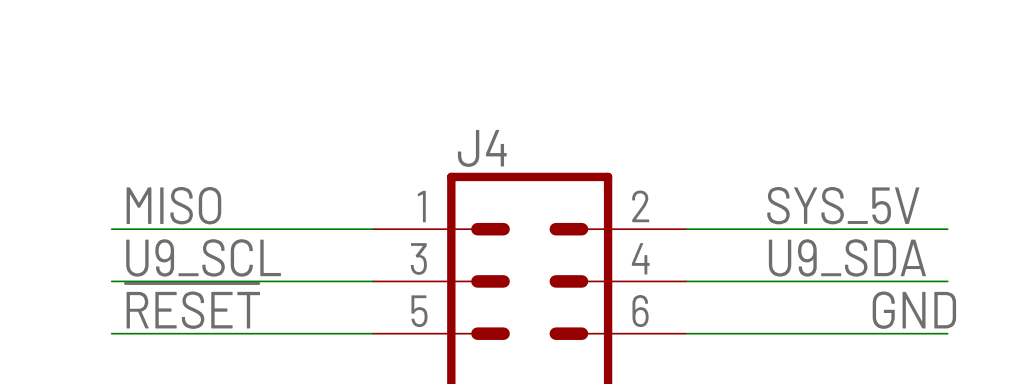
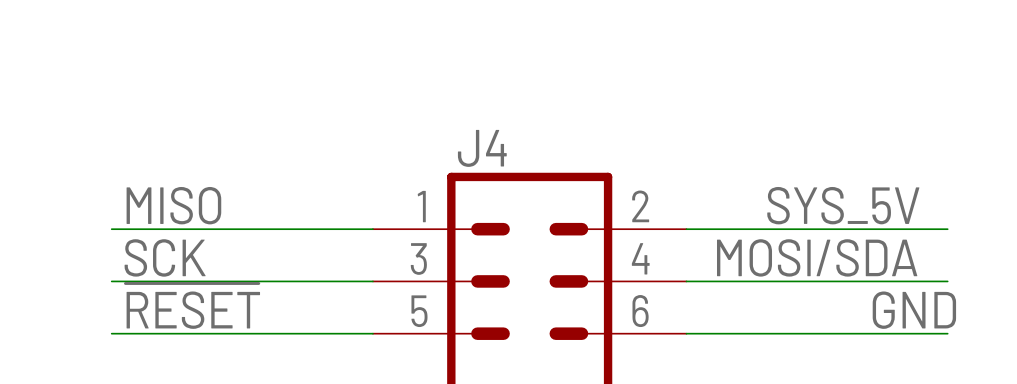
label: U9_SCL (203, 257) -> SCK (165, 257)
label: none -> MOSI/SDA (817, 257)
label: U9_SDA (847, 257) -> none

